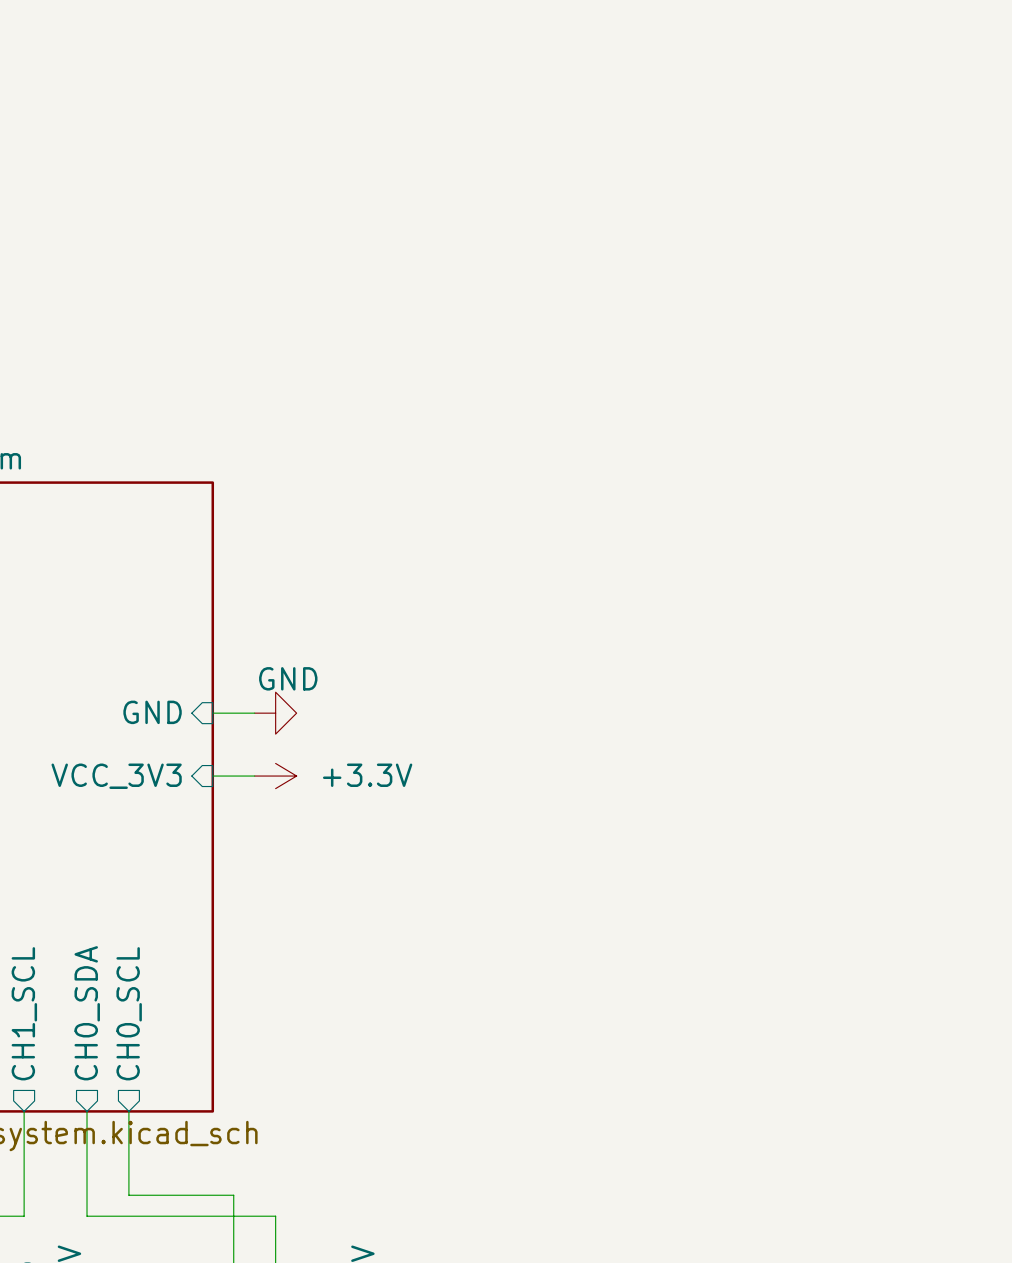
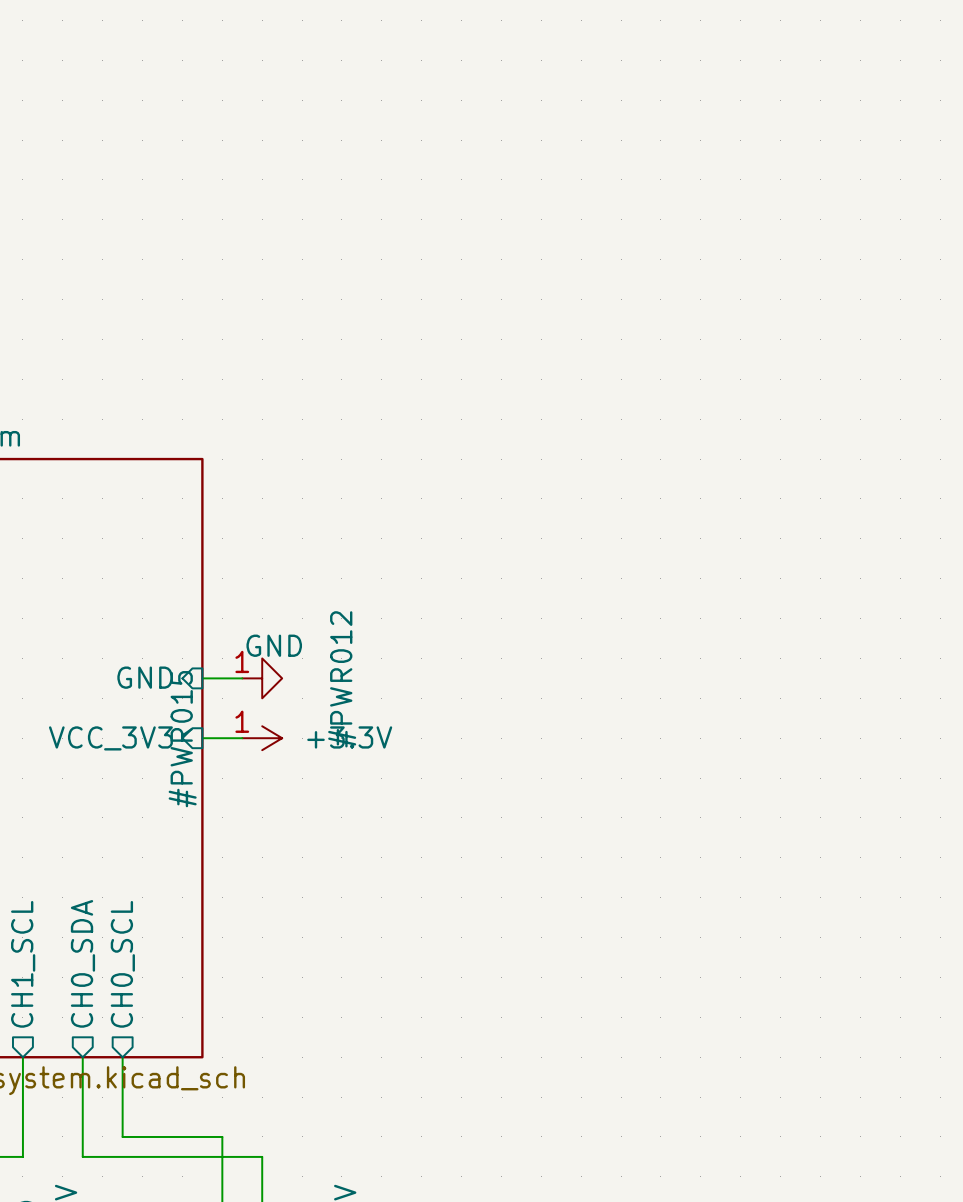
#PWR012 pin number: none -> 1 (242, 661)
#PWR012 name: none -> #PWR012 (342, 679)
#PWR015 pin number: none -> 1 (242, 721)
#PWR015 name: none -> #PWR015 (182, 739)

